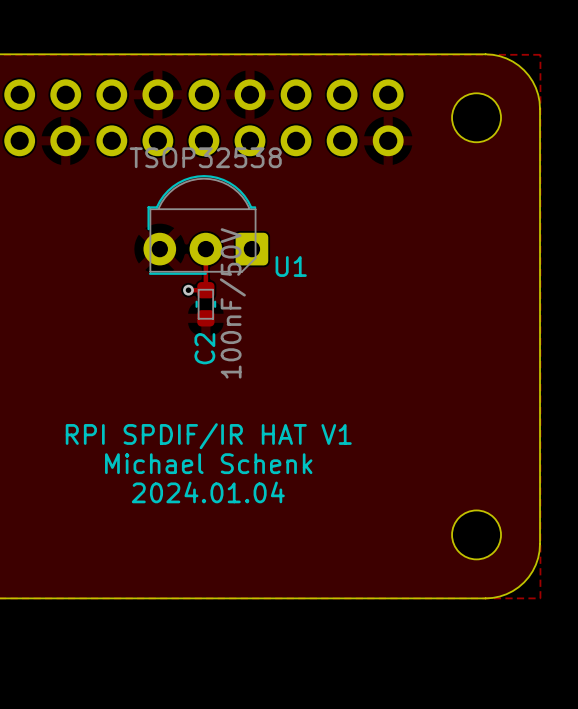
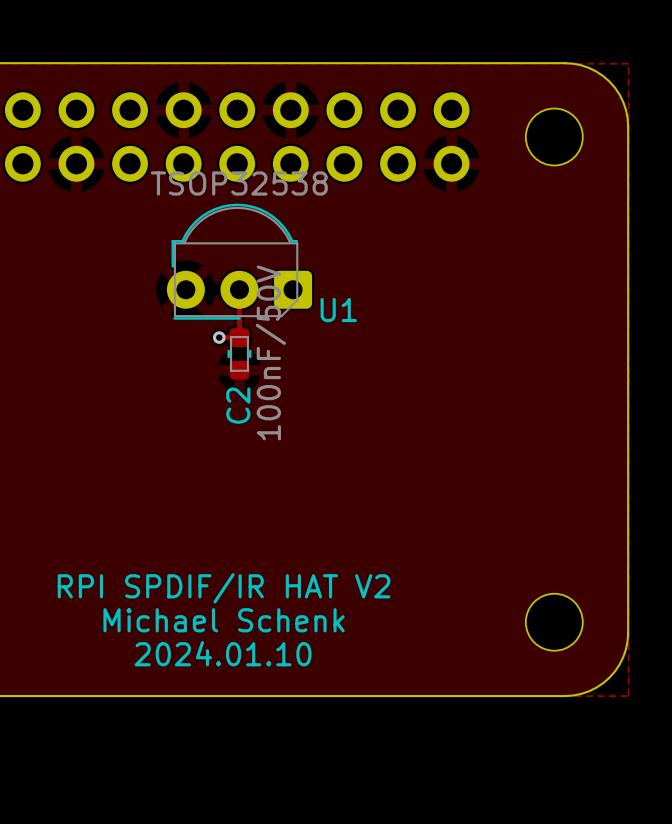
text: RPI SPDIF/IR HAT V1 (208, 436) -> none
text position: Michael Schenk (208, 463) -> Michael Schenk (224, 620)
text: 2024.01.04 (208, 492) -> none
text: none -> RPI SPDIF/IR HAT V2 (224, 588)
text: none -> 2024.01.10 (223, 653)

